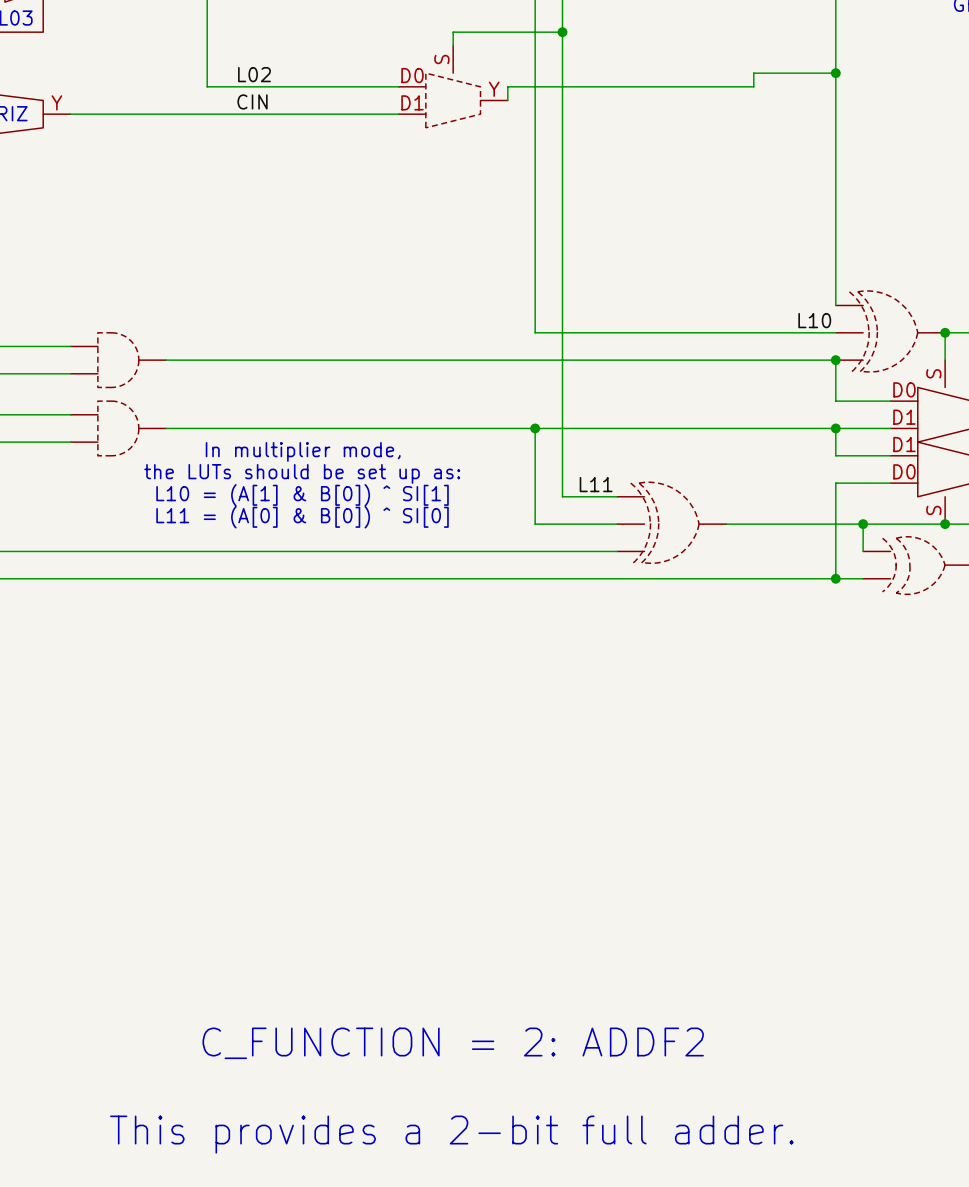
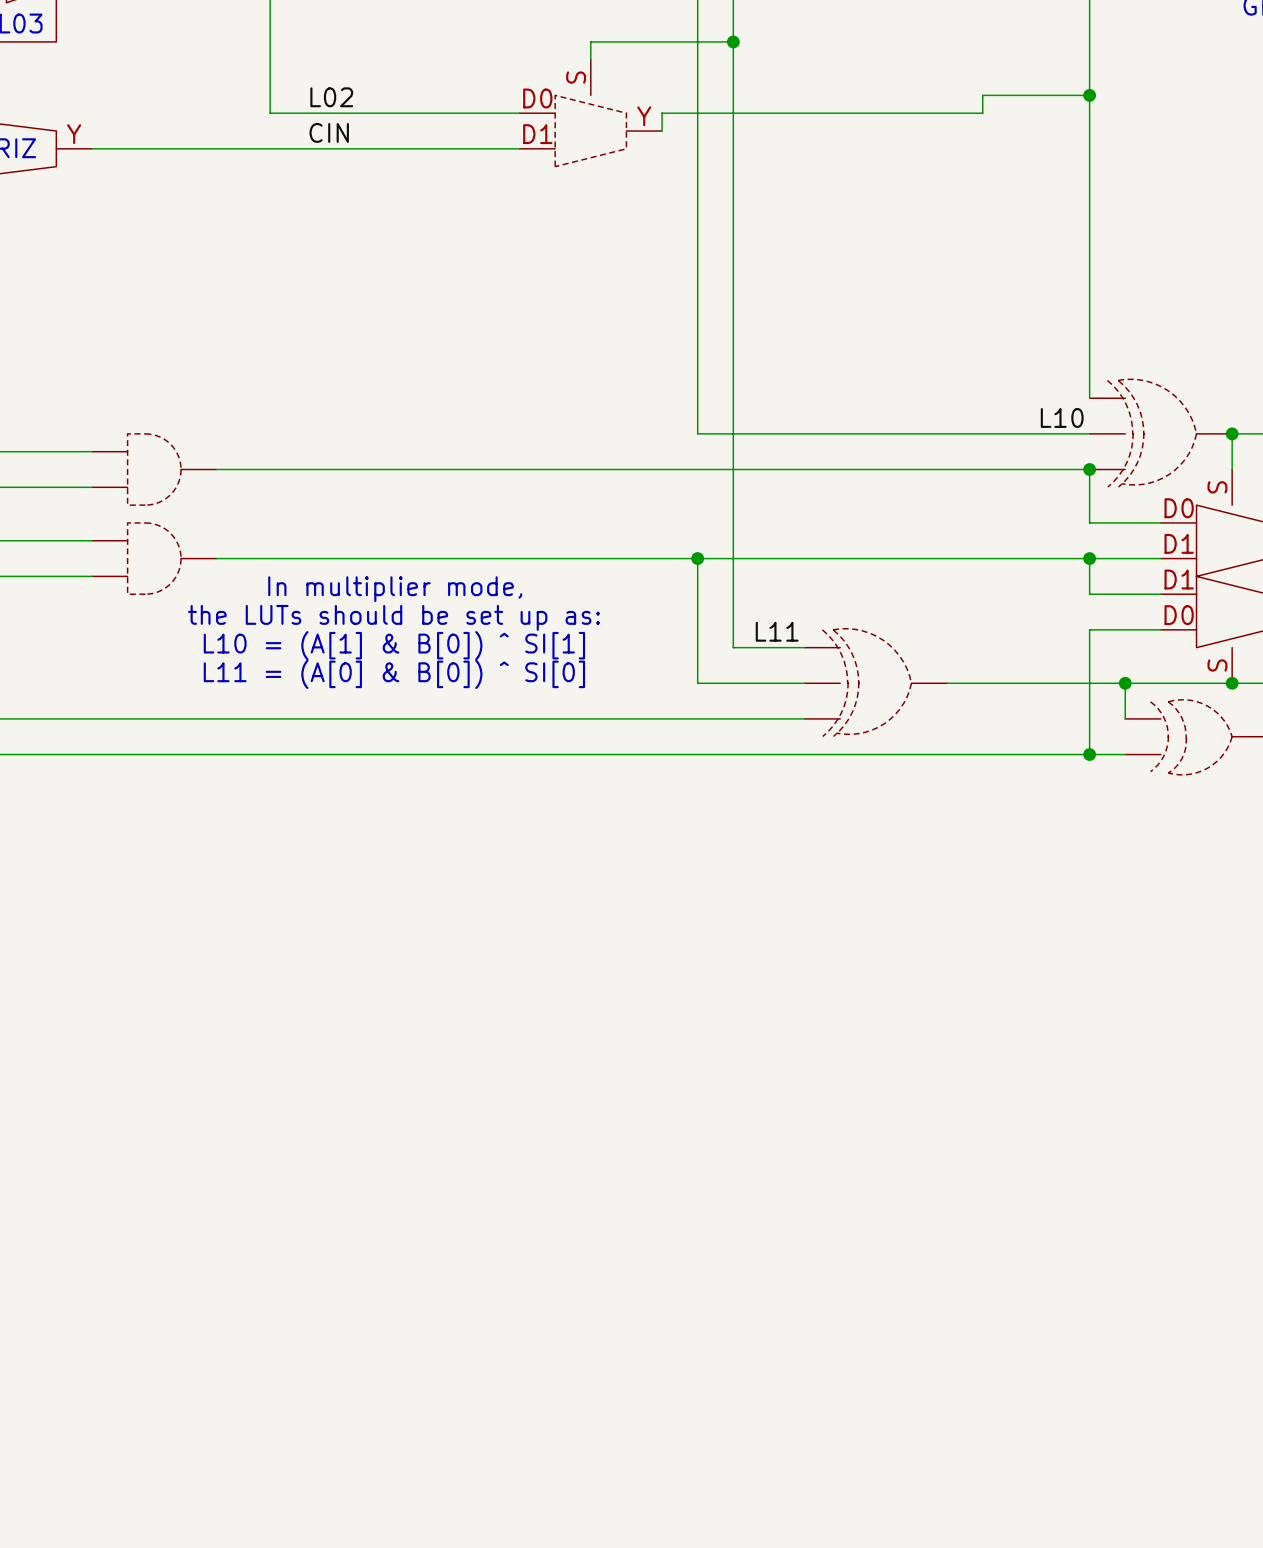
text: C_FUNCTION = 2: ADDF2 (453, 1043) -> none
text: This provides a 2-bit full adder. (451, 1134) -> none

